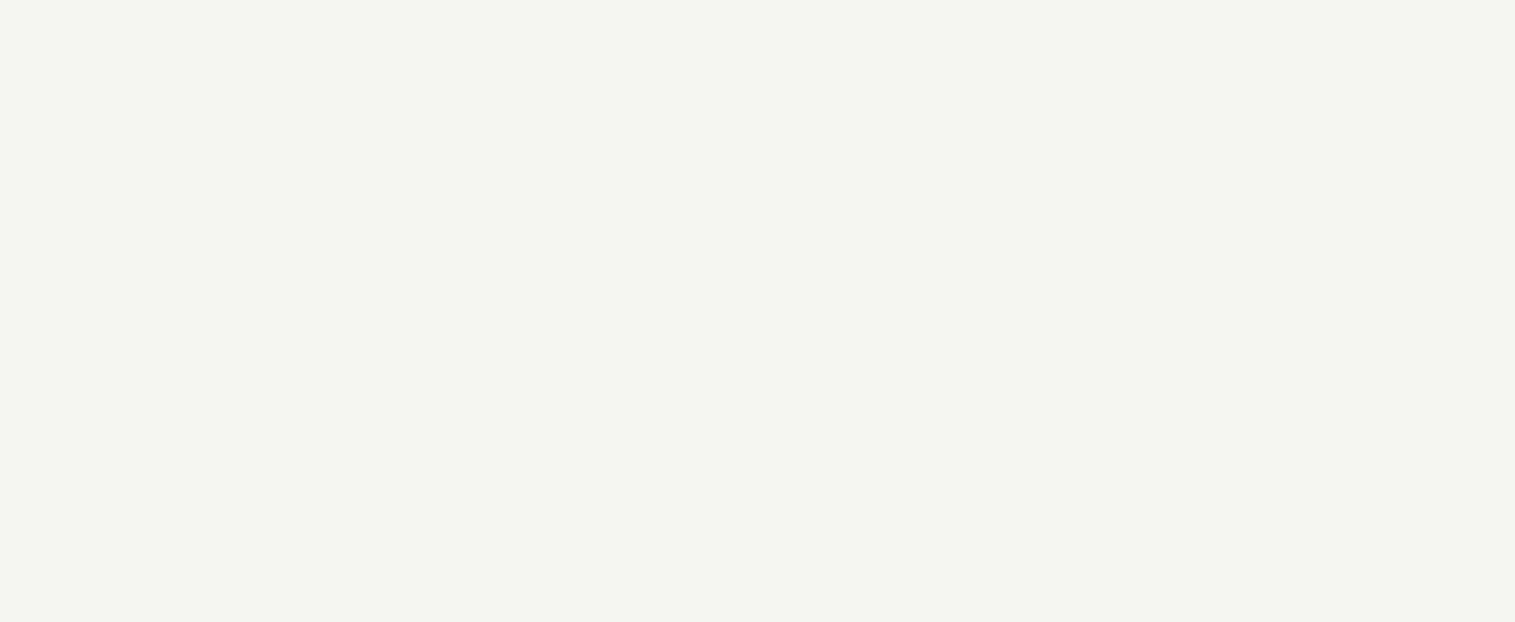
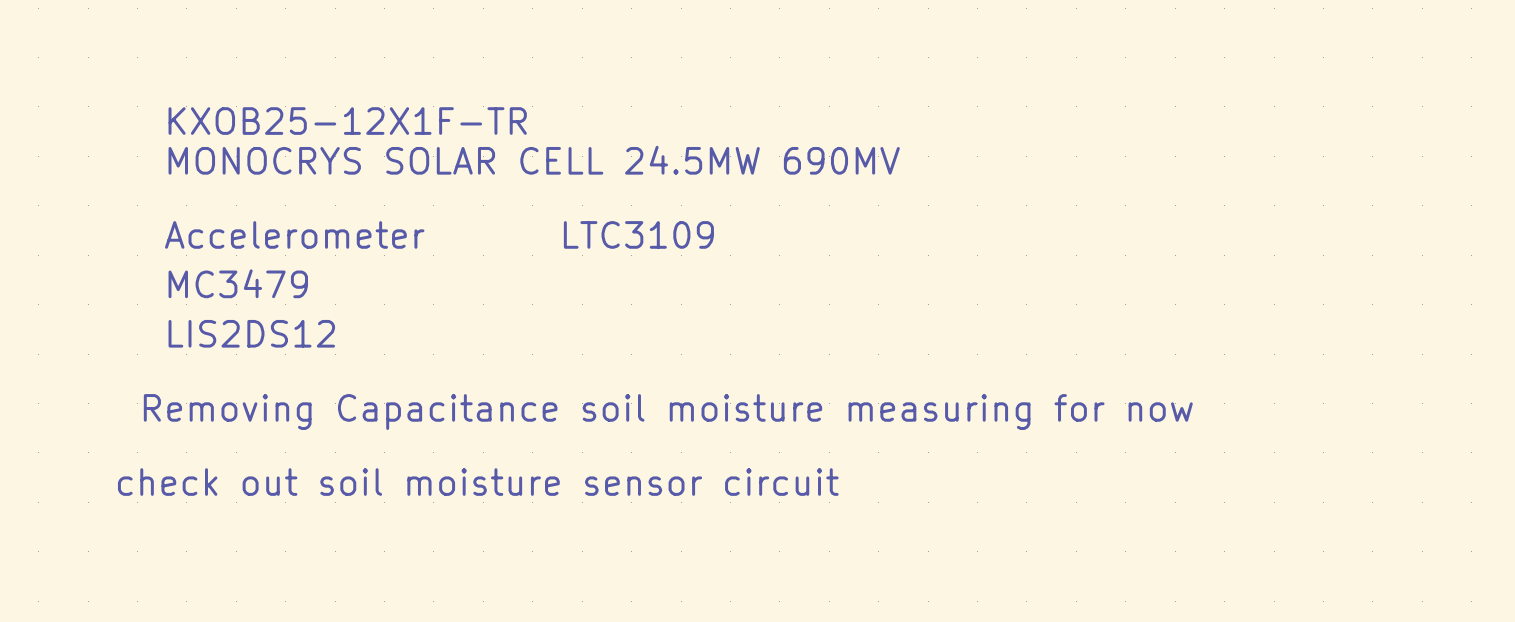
text: none -> KXOB25-12X1F-TR (347, 121)
text: none -> MONOCRYS SOLAR CELL 24.5MW 690MV (534, 160)
text: none -> Accelerometer (294, 234)
text: none -> LTC3109 (638, 234)
text: none -> MC3479 (238, 283)
text: none -> LIS2DS12 (251, 333)
text: none -> Removing Capacitance soil moisture measuring for now (668, 412)
text: none -> check out soil moisture sensor circuit (478, 482)

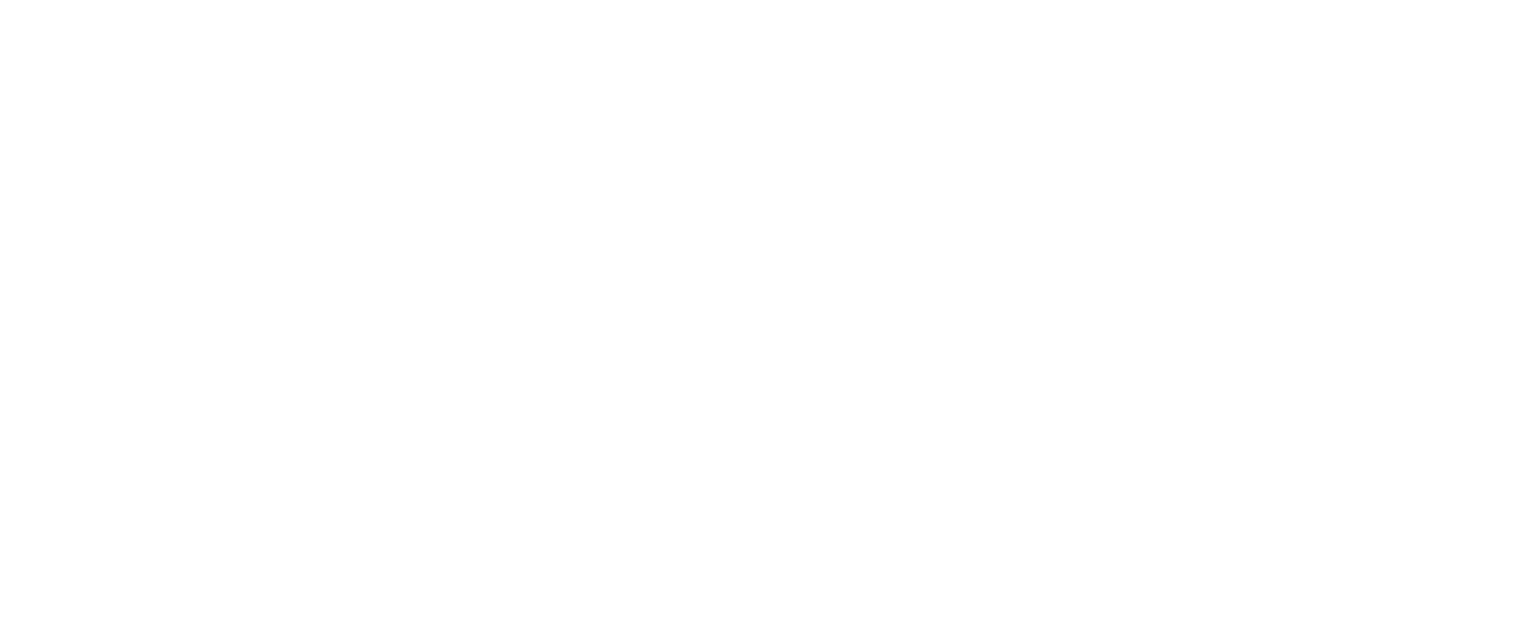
text: KXOB25-12X1F-TR (347, 121) -> none
text: MONOCRYS SOLAR CELL 24.5MW 690MV (534, 160) -> none
text: Accelerometer (294, 234) -> none
text: LTC3109 (638, 234) -> none
text: MC3479 (238, 283) -> none
text: LIS2DS12 (251, 333) -> none
text: Removing Capacitance soil moisture measuring for now (668, 412) -> none
text: check out soil moisture sensor circuit (478, 482) -> none

